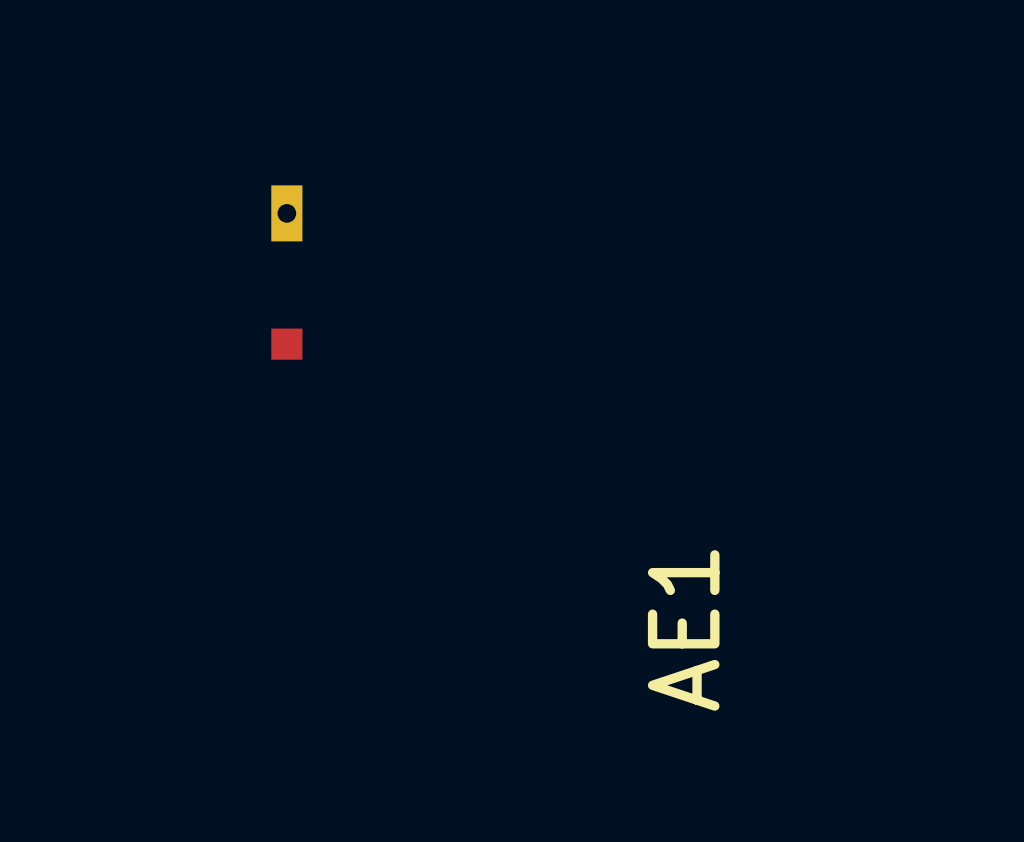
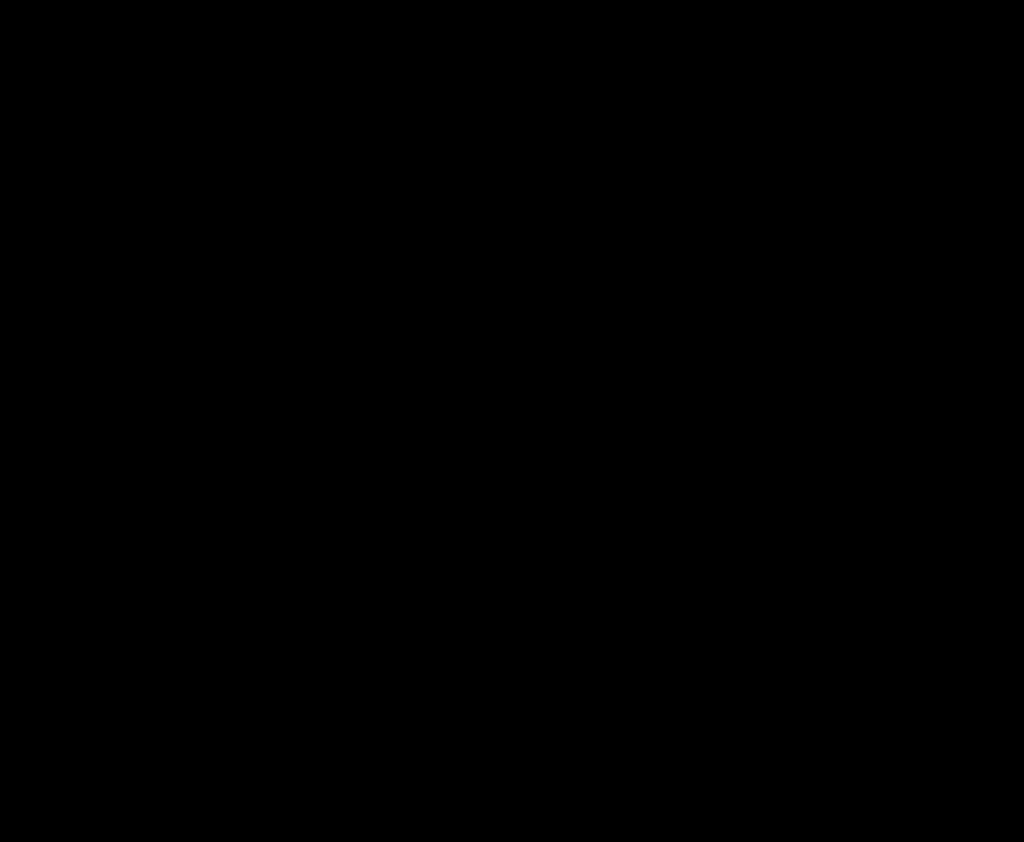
AE1: (286, 272) -> none

